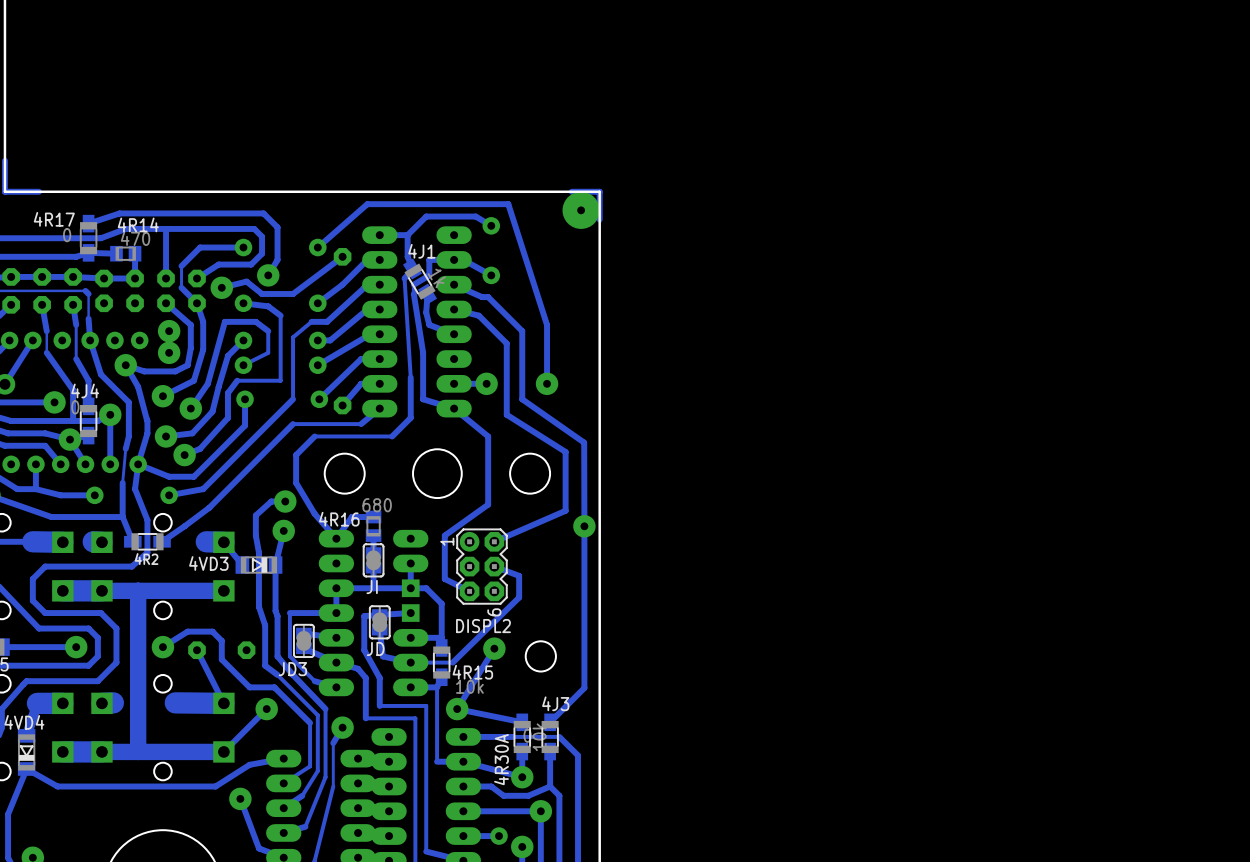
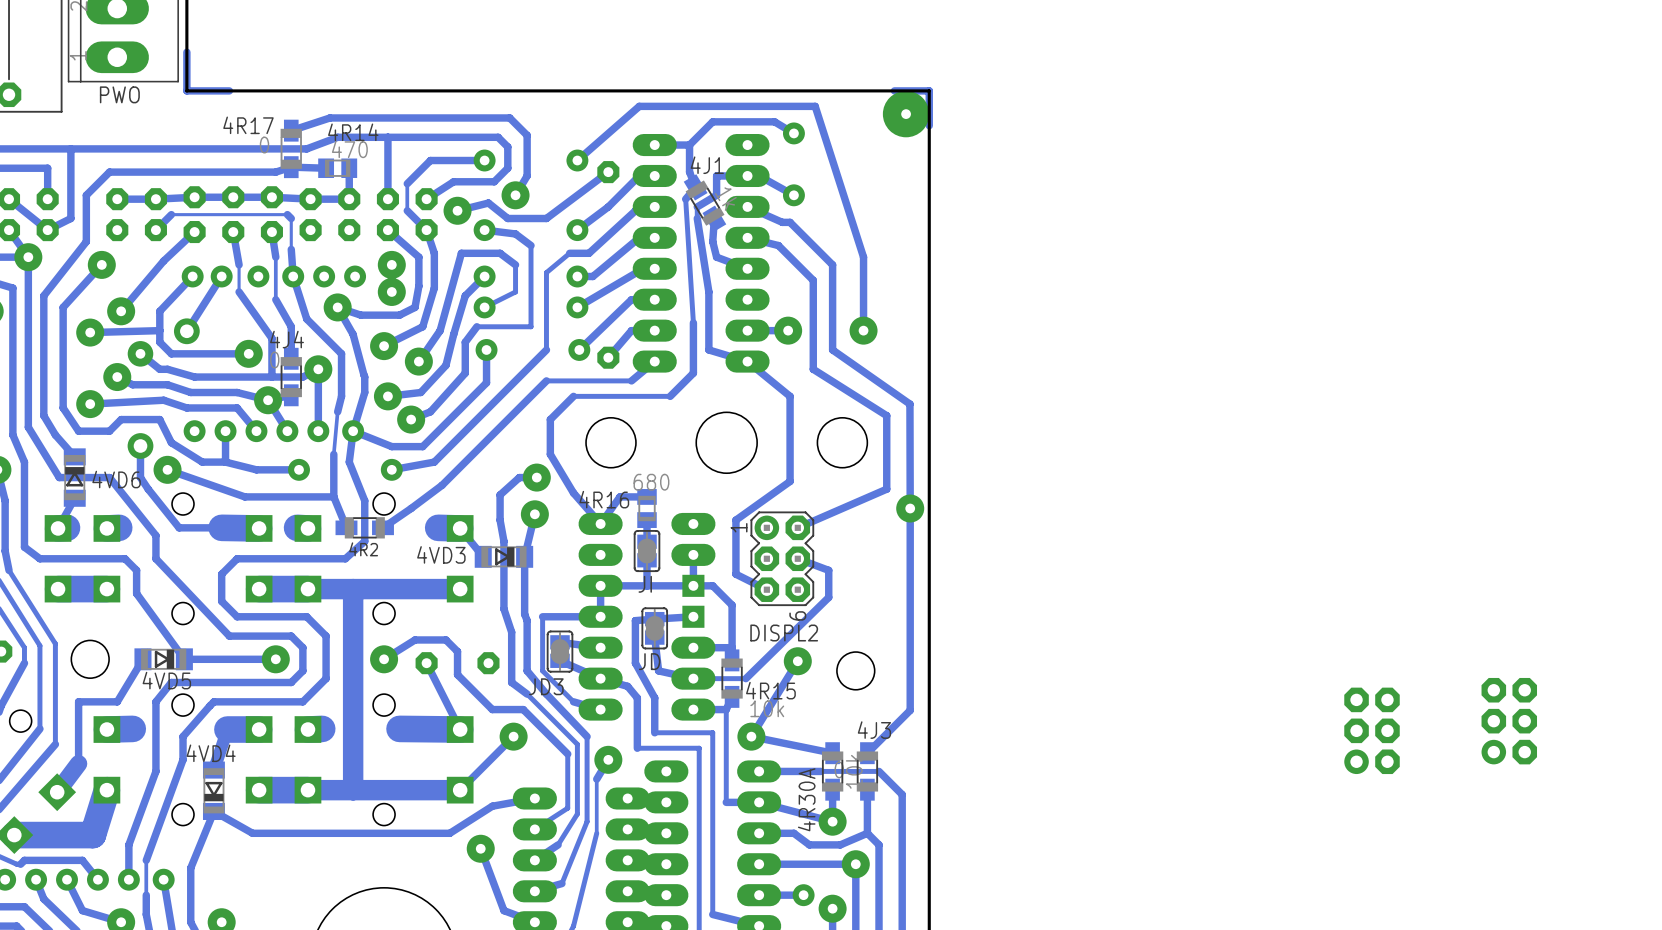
part: none -> (1509, 721)
part: none -> (1372, 730)

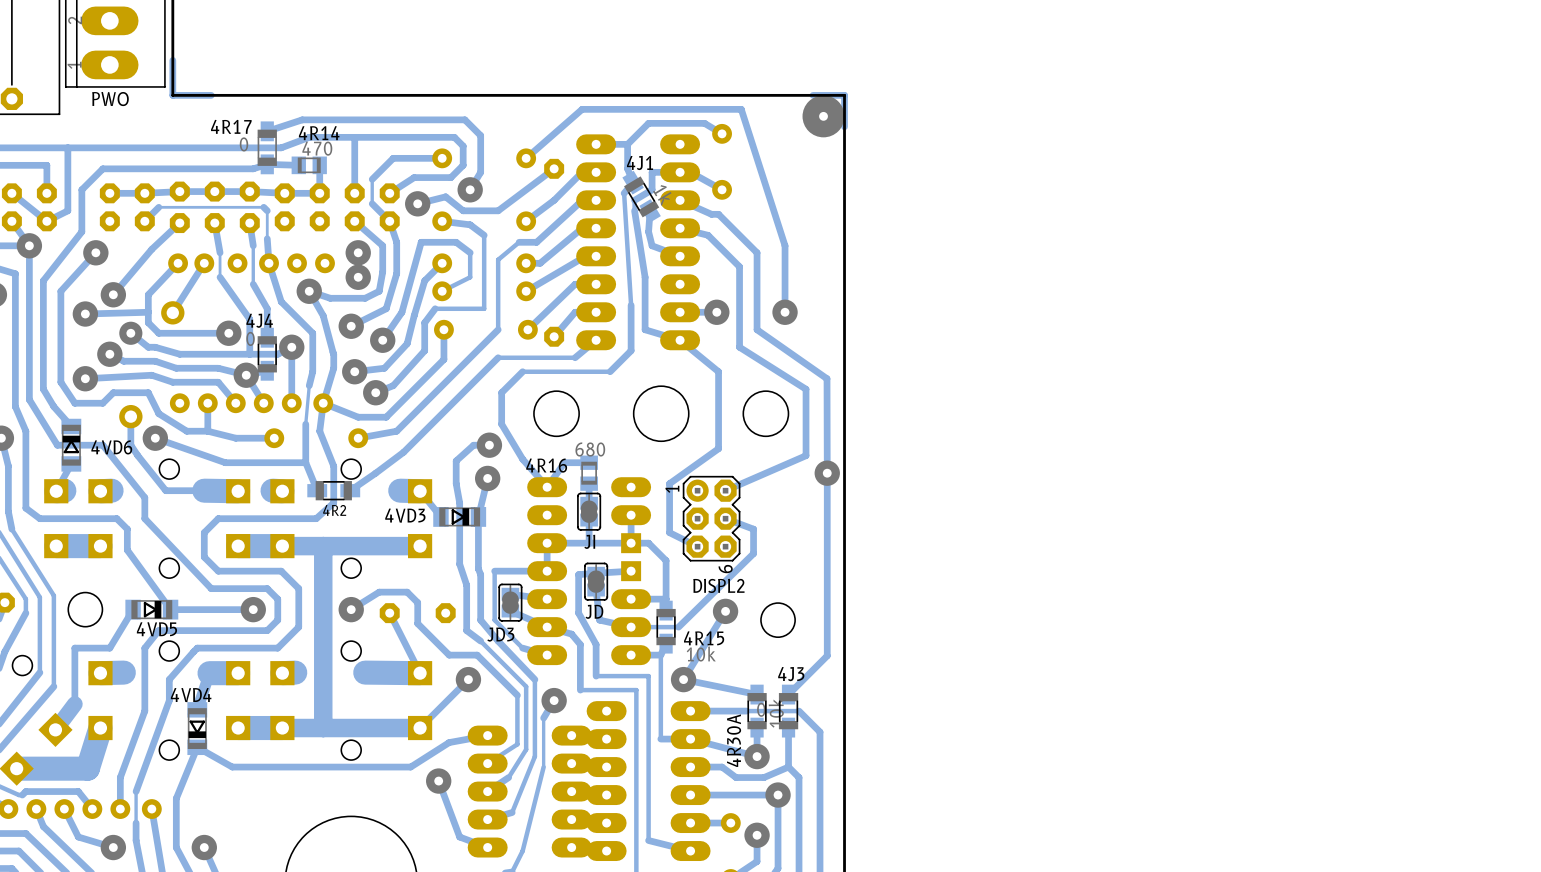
part: (1509, 721) -> none
part: (1372, 730) -> none

